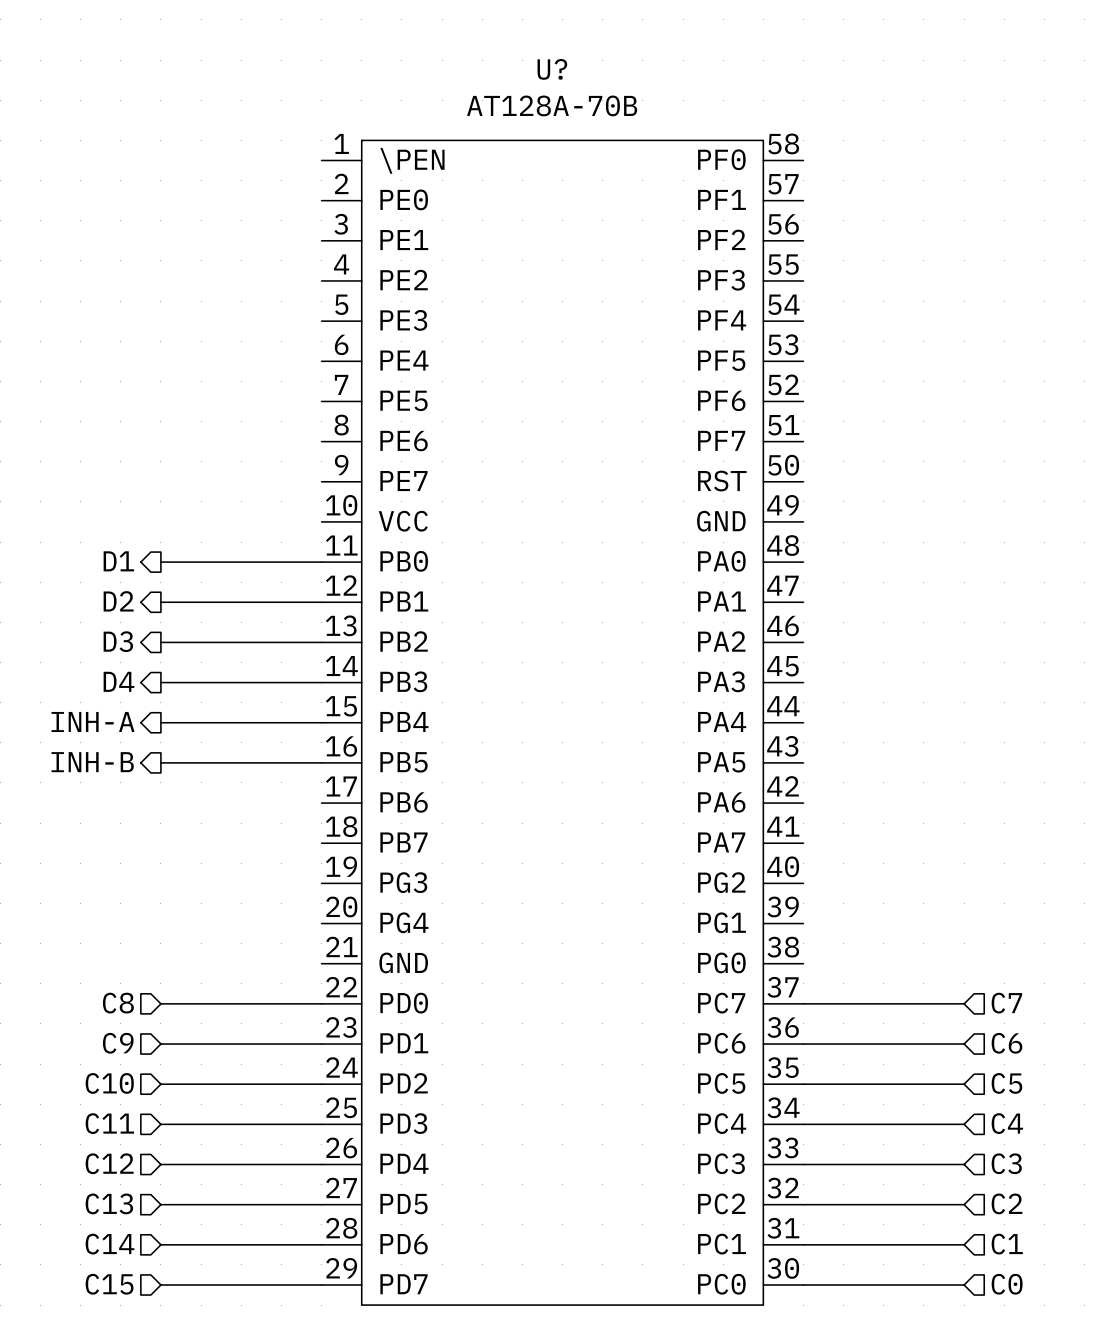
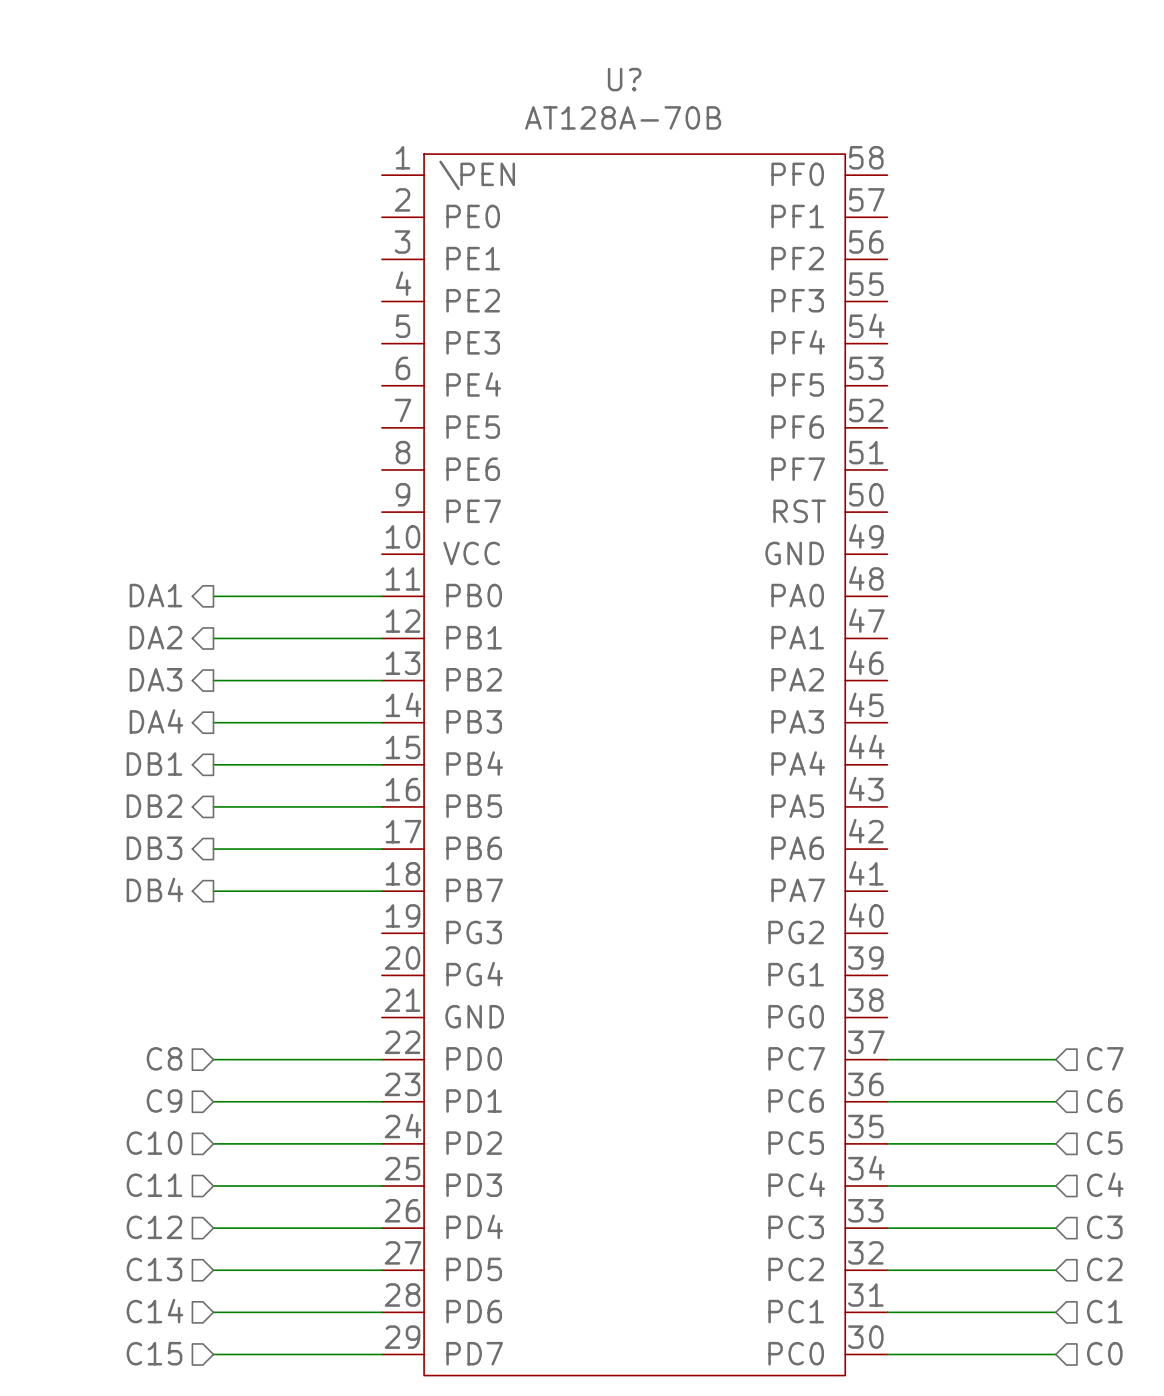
hierarchical label: D1 (118, 561) -> DA1 (155, 595)
hierarchical label: D2 (118, 601) -> DA2 (155, 637)
hierarchical label: D3 (118, 641) -> DA3 (155, 679)
hierarchical label: D4 (118, 681) -> DA4 (156, 721)
hierarchical label: INH-A (93, 721) -> DB1 (154, 764)
hierarchical label: INH-B (92, 762) -> DB2 (154, 806)
hierarchical label: none -> DB3 (154, 848)
wire: none -> (213, 849) (381, 849)
hierarchical label: none -> DB4 (154, 889)
wire: none -> (213, 891) (381, 891)

